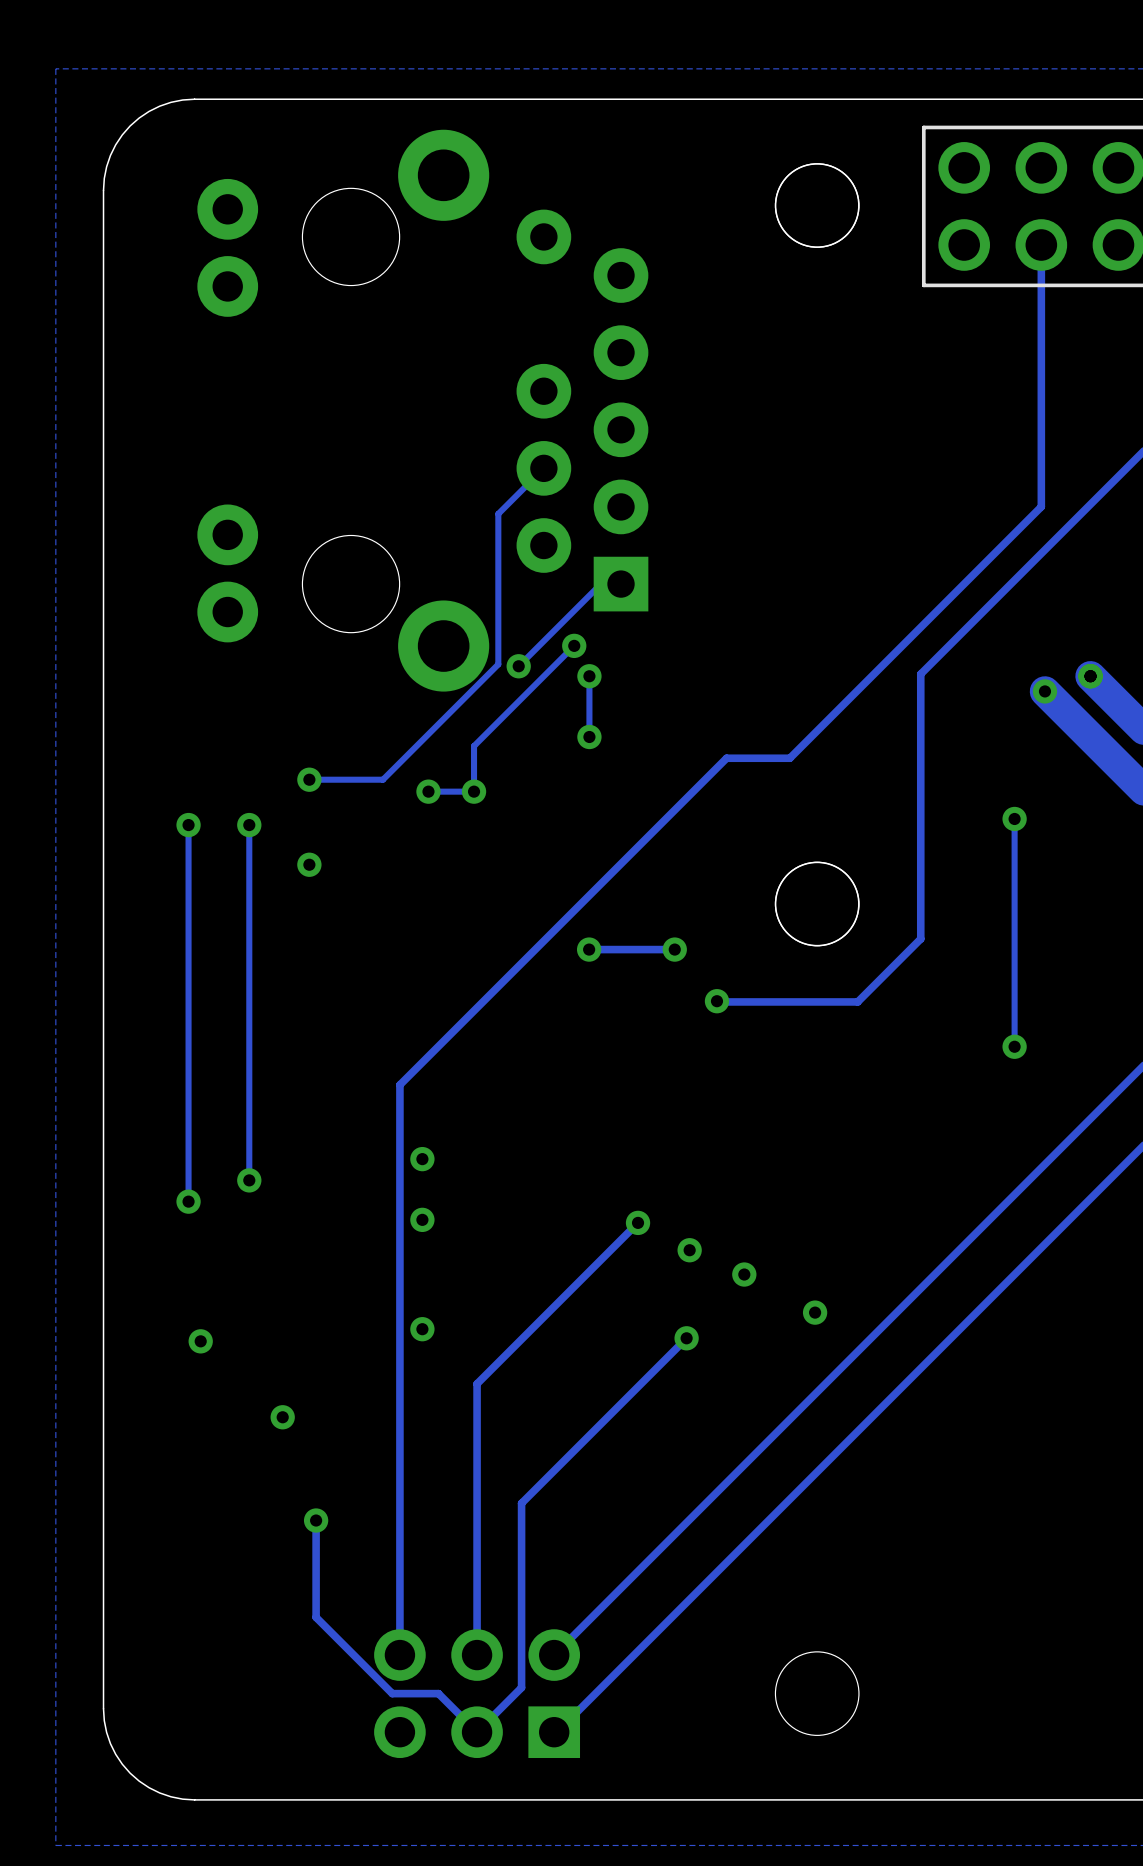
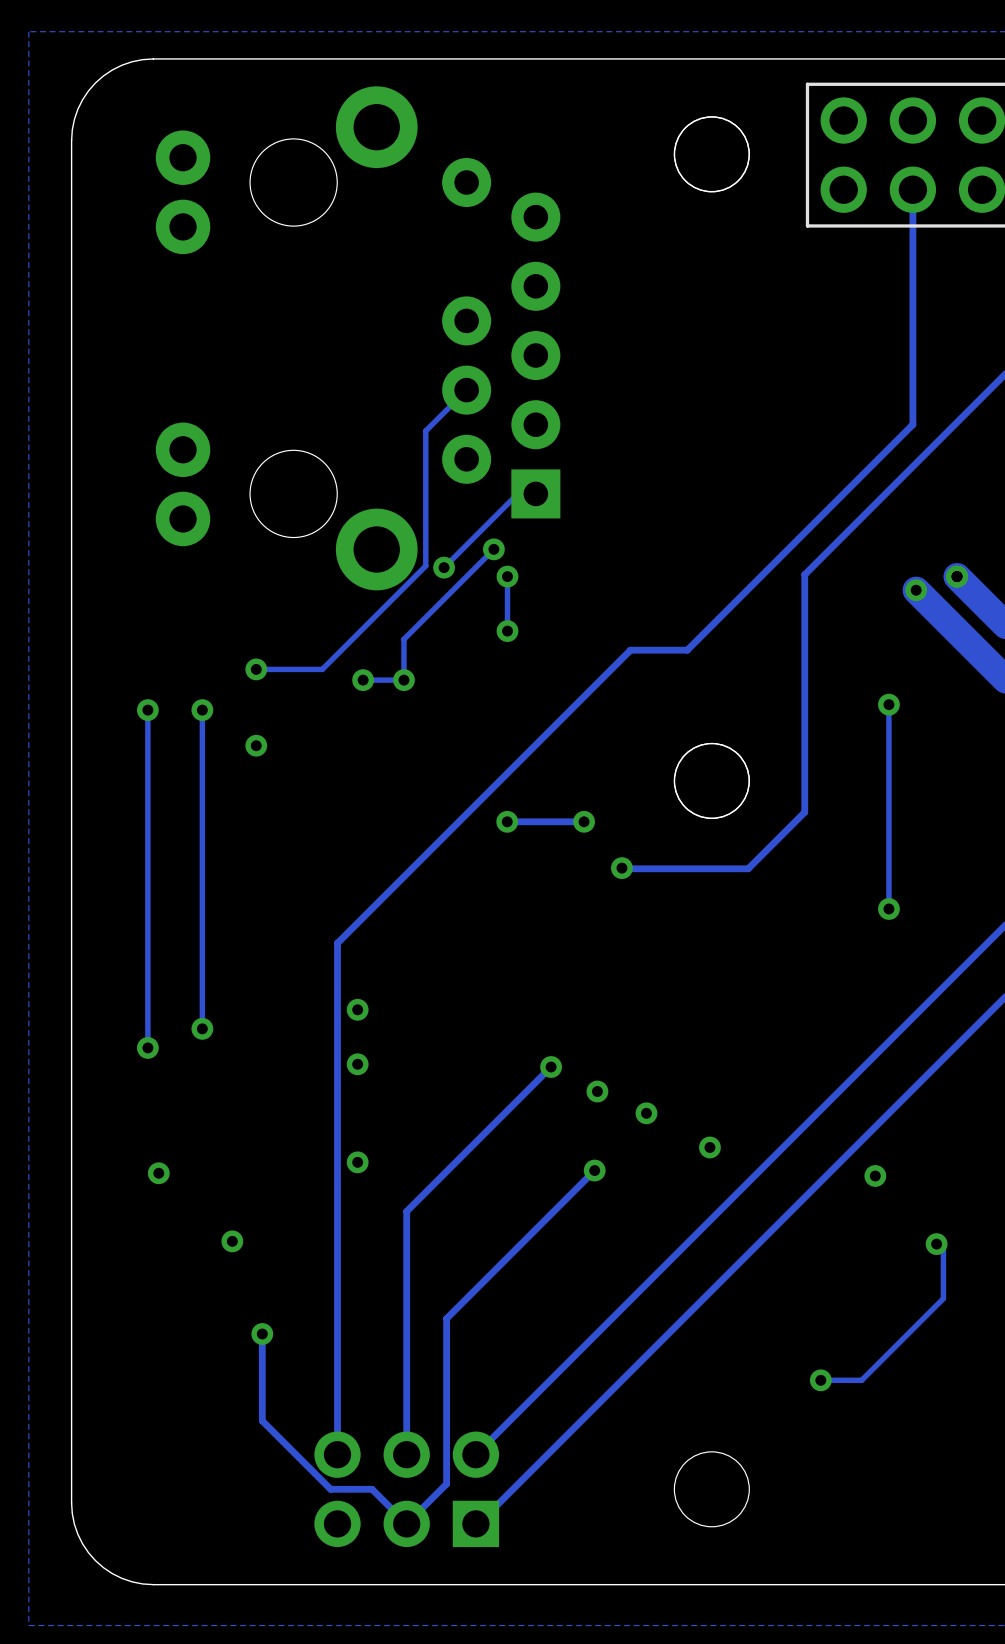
via: none -> (875, 1175)
track: none -> (936, 1244) (943, 1250) (943, 1298) (861, 1380) (820, 1380)
via: none -> (936, 1244)
via: none -> (820, 1380)

